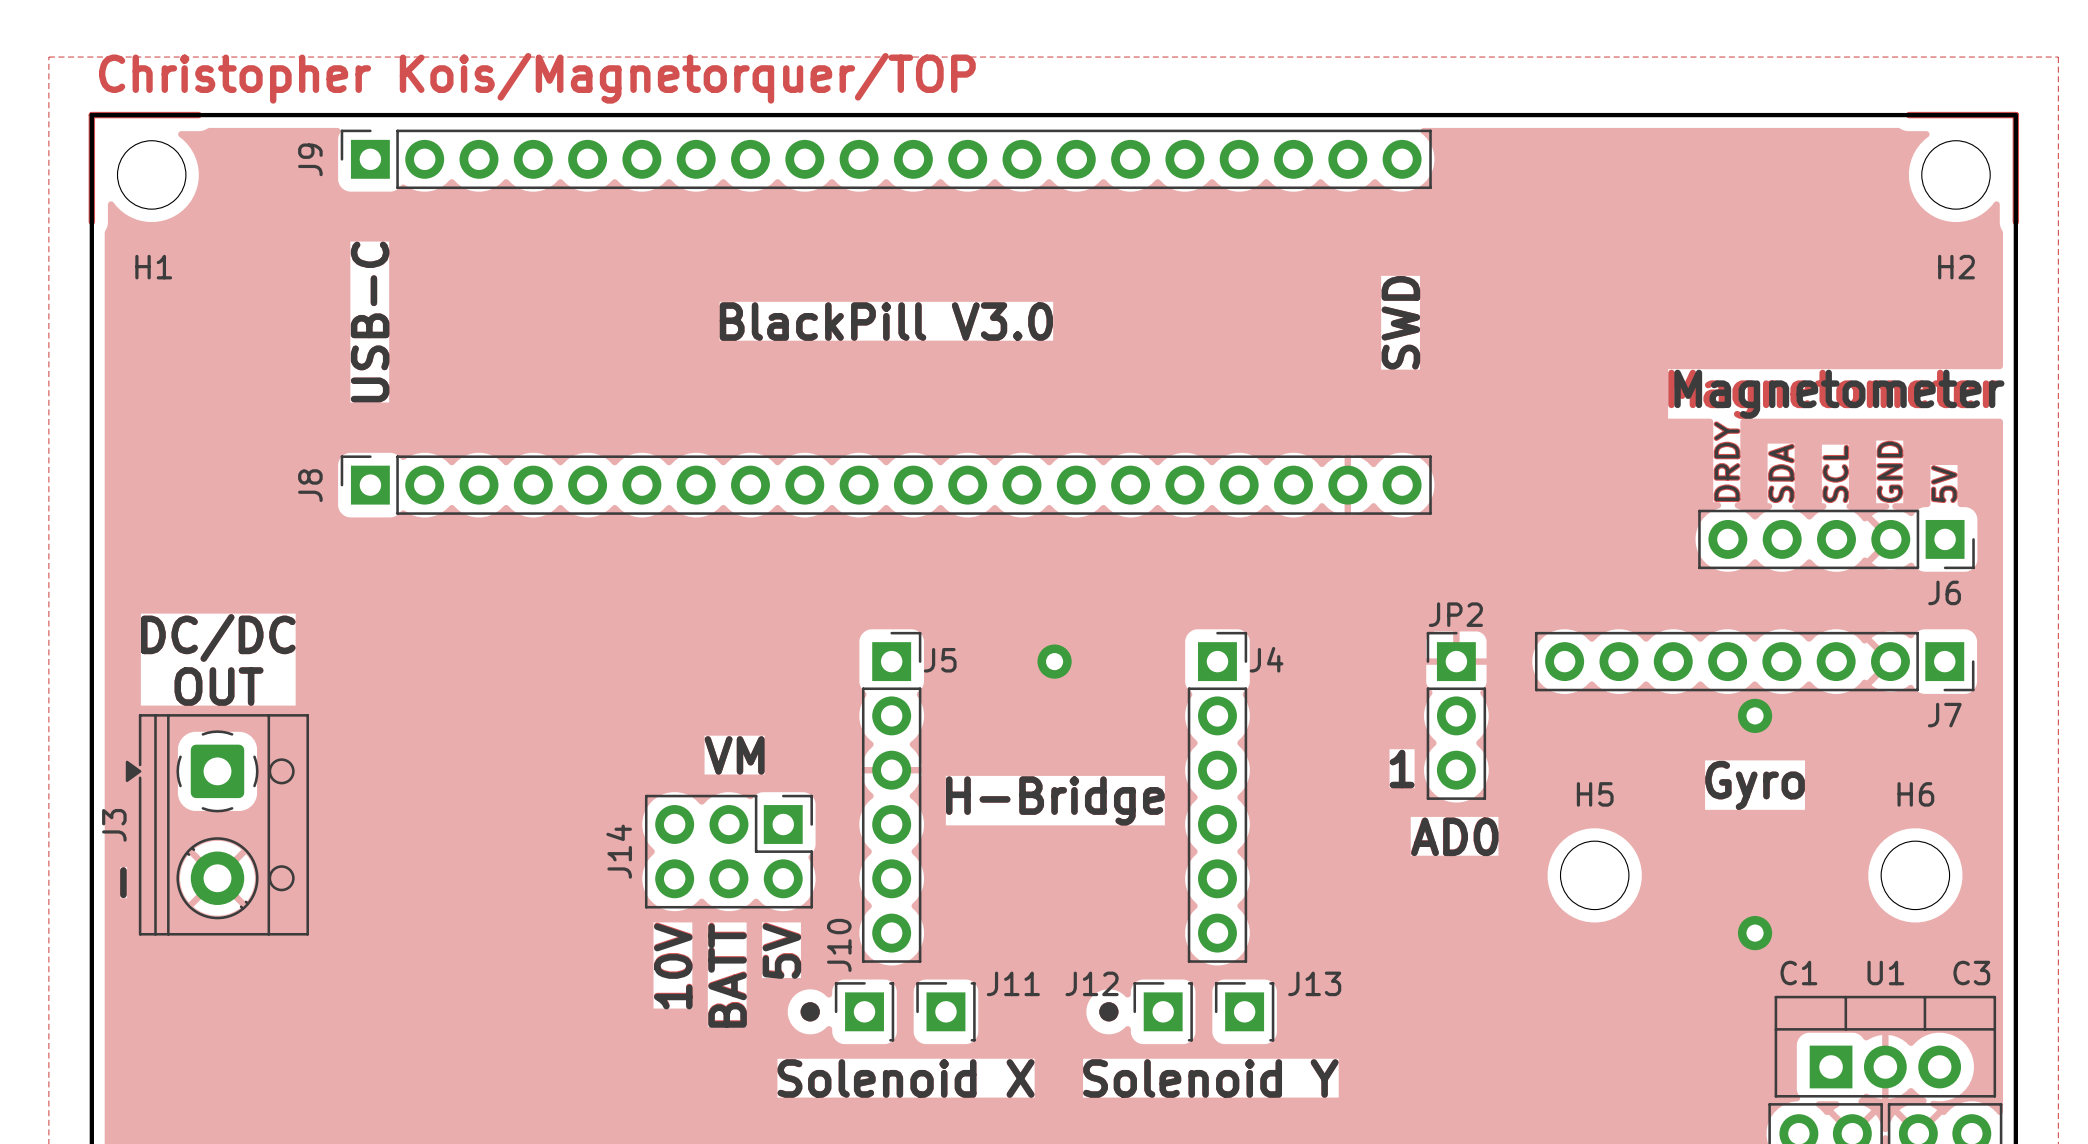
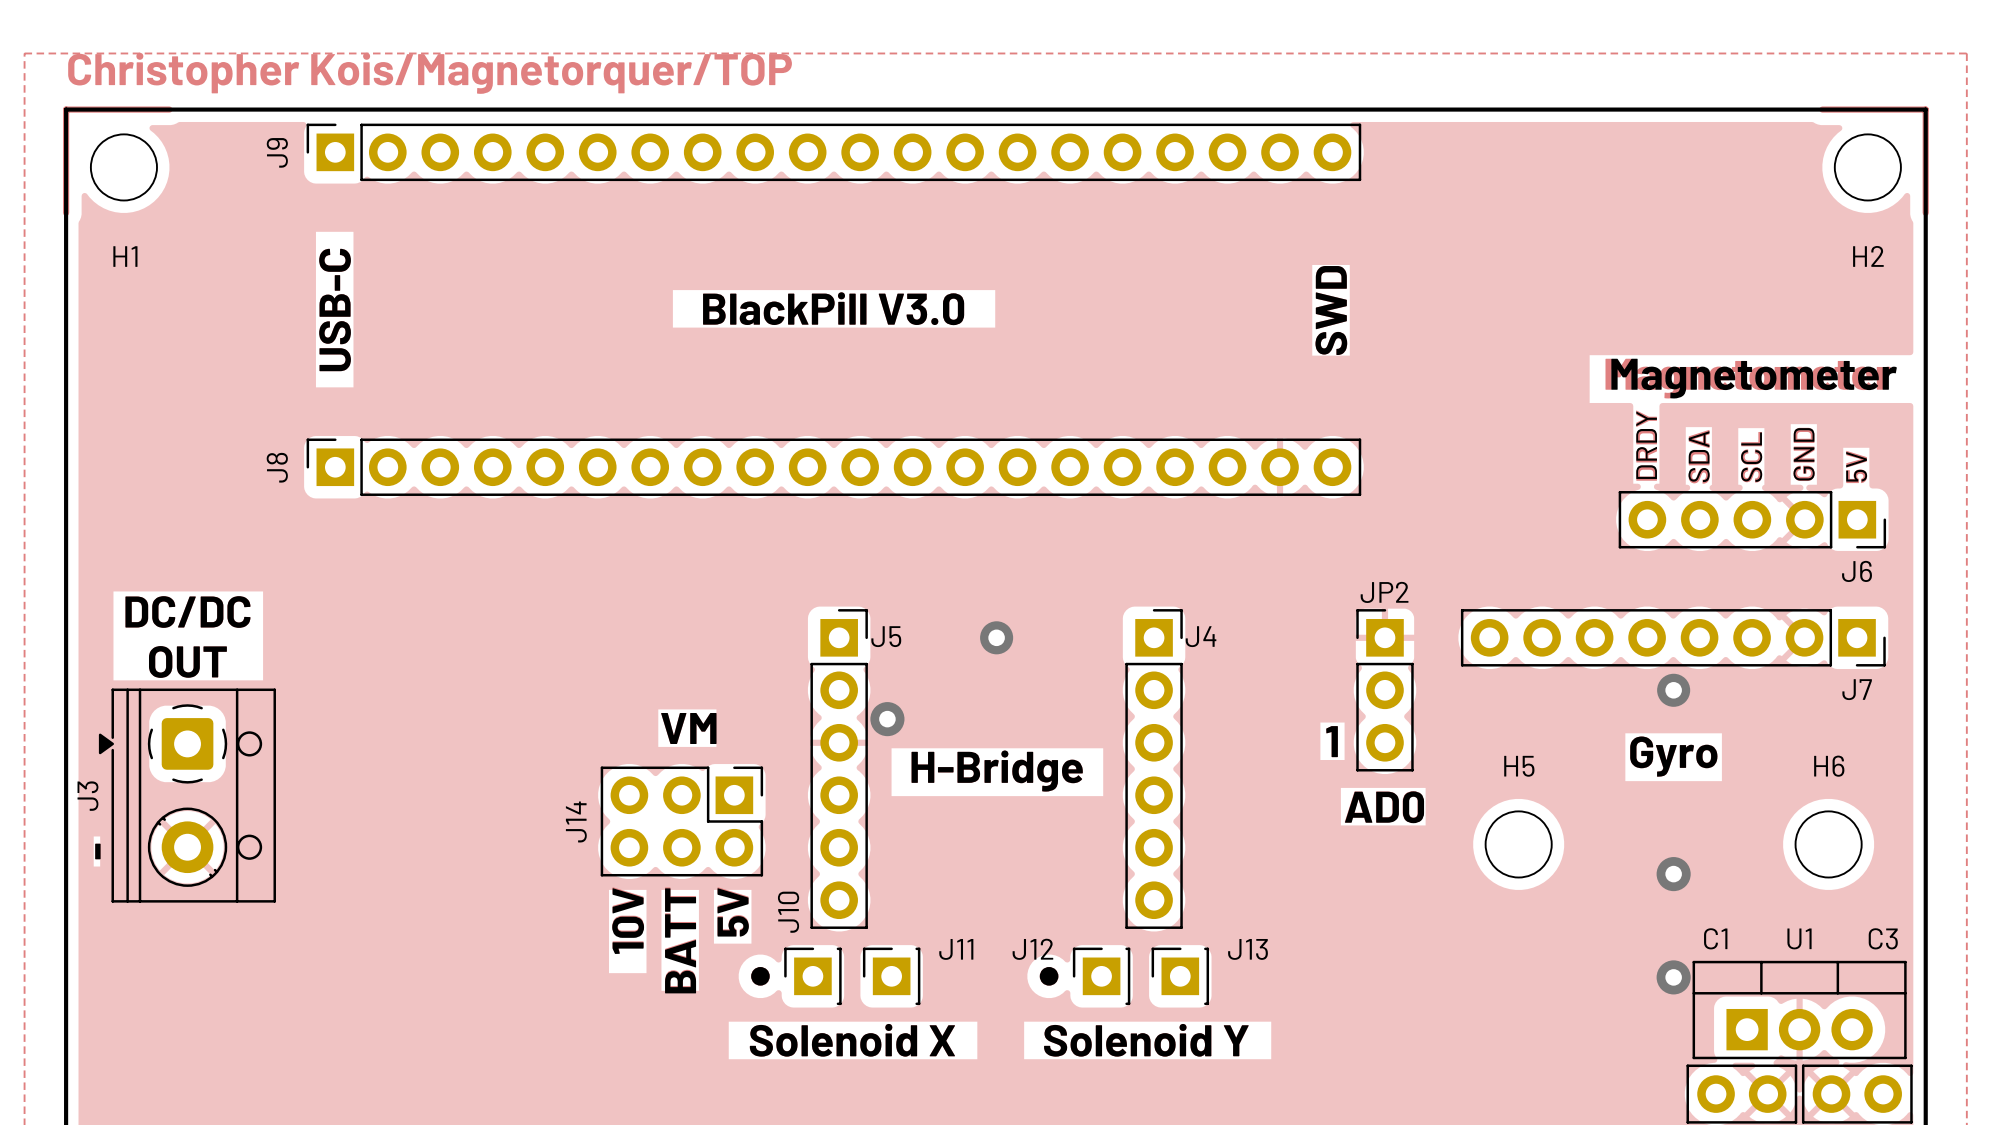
via: none -> (887, 719)
via: none -> (1673, 874)
via: (1755, 933) -> none
via: none -> (1673, 977)

